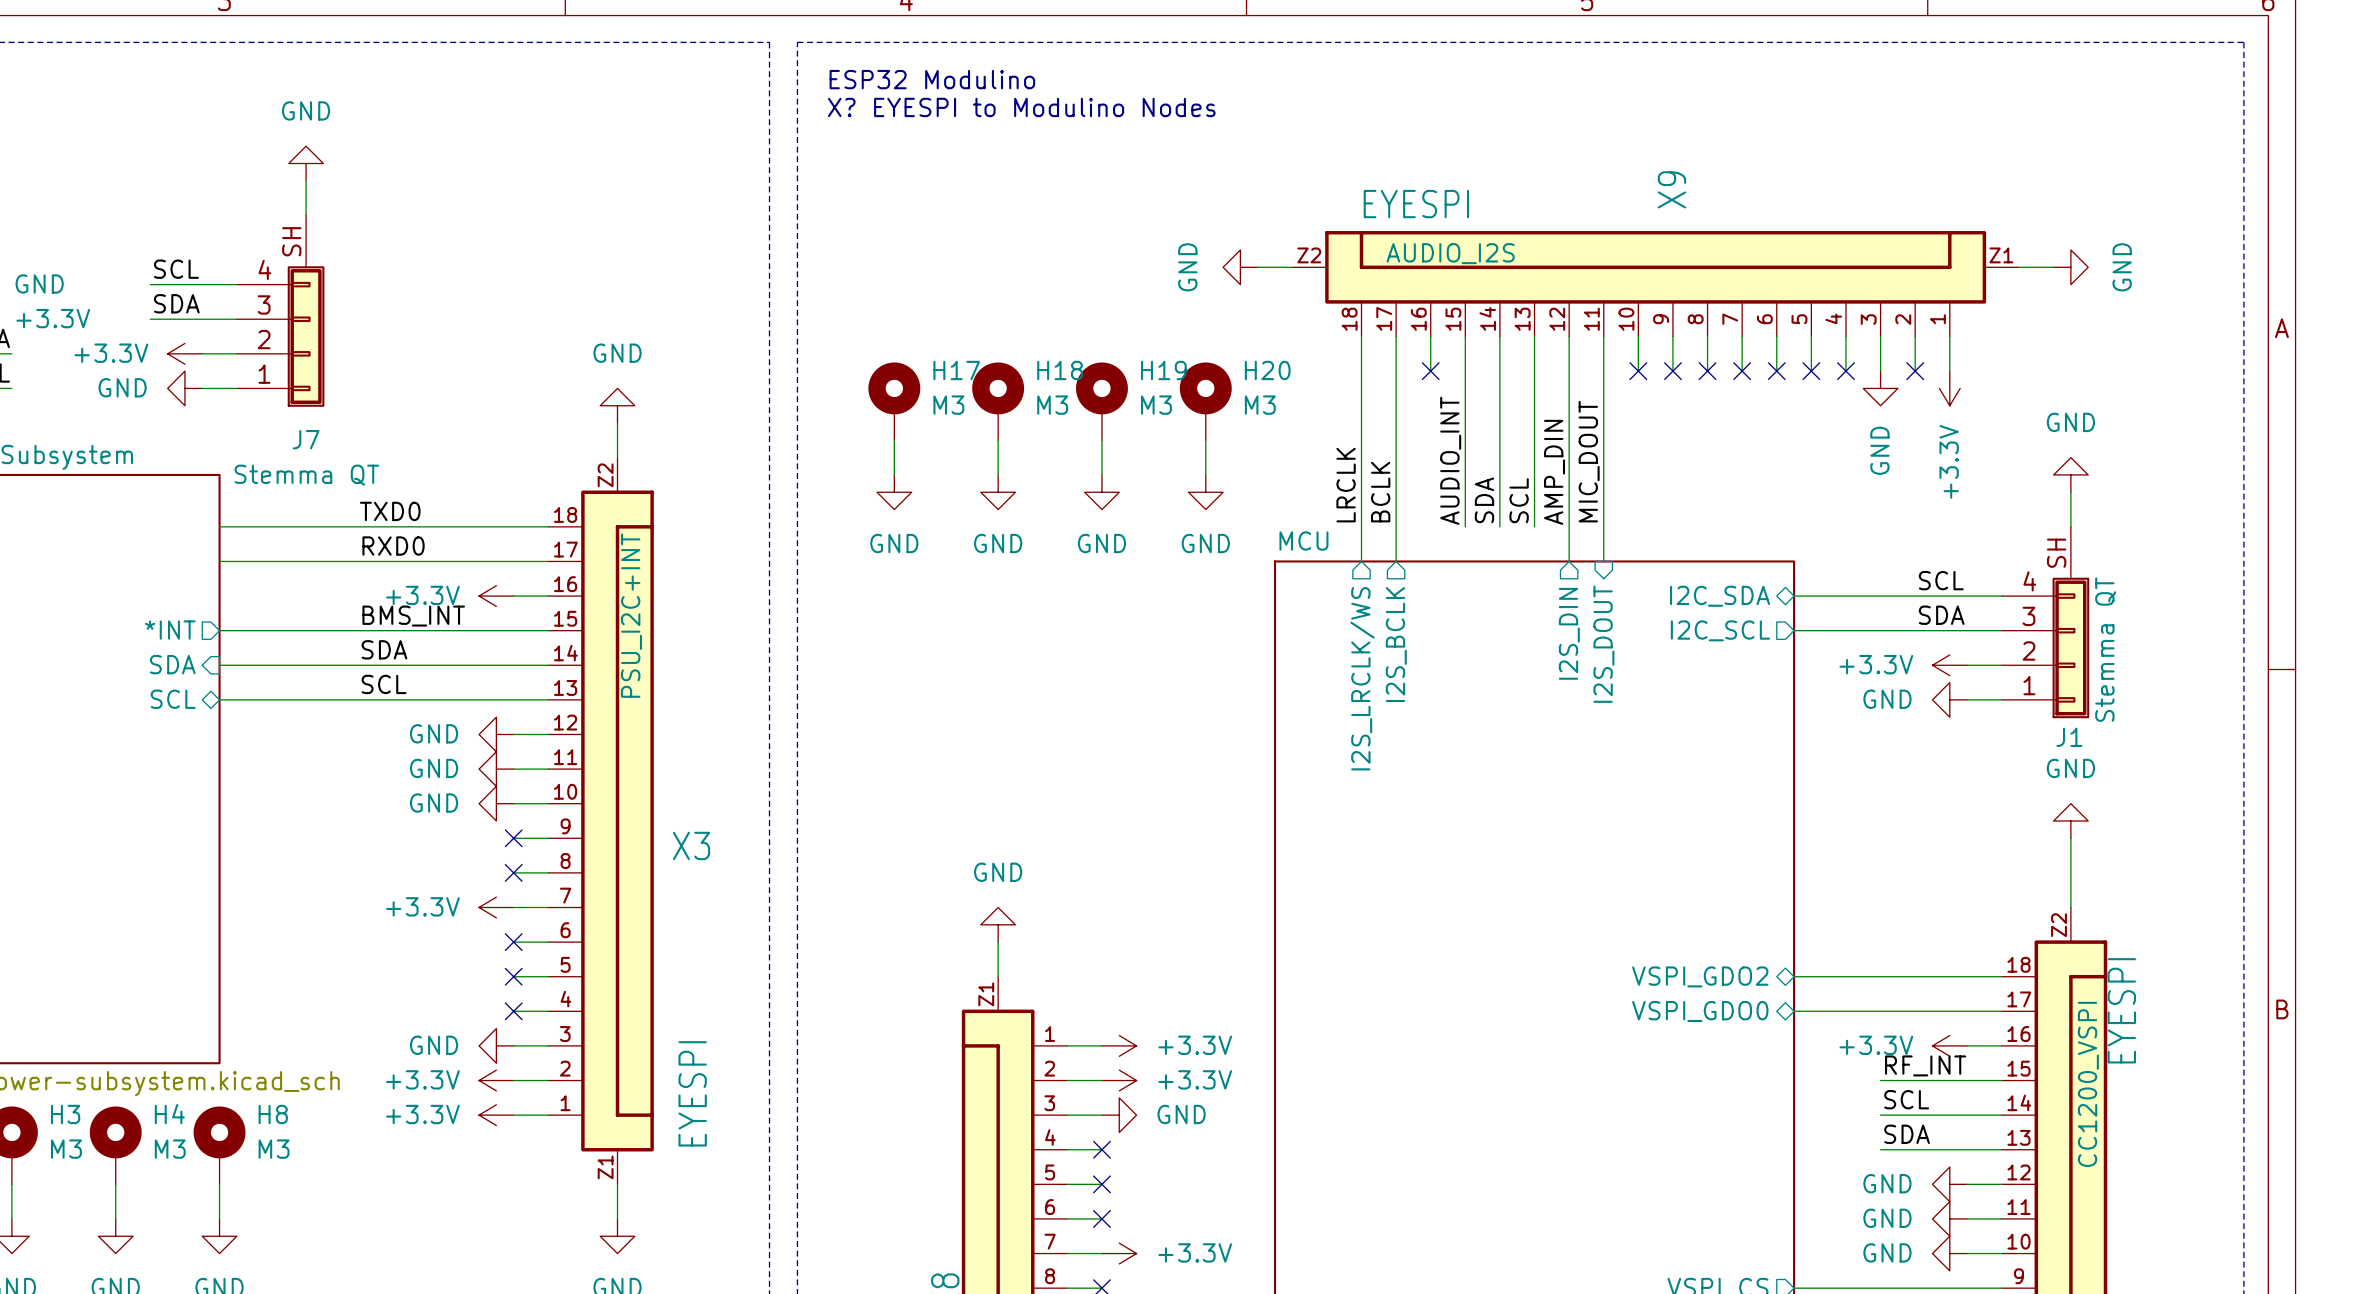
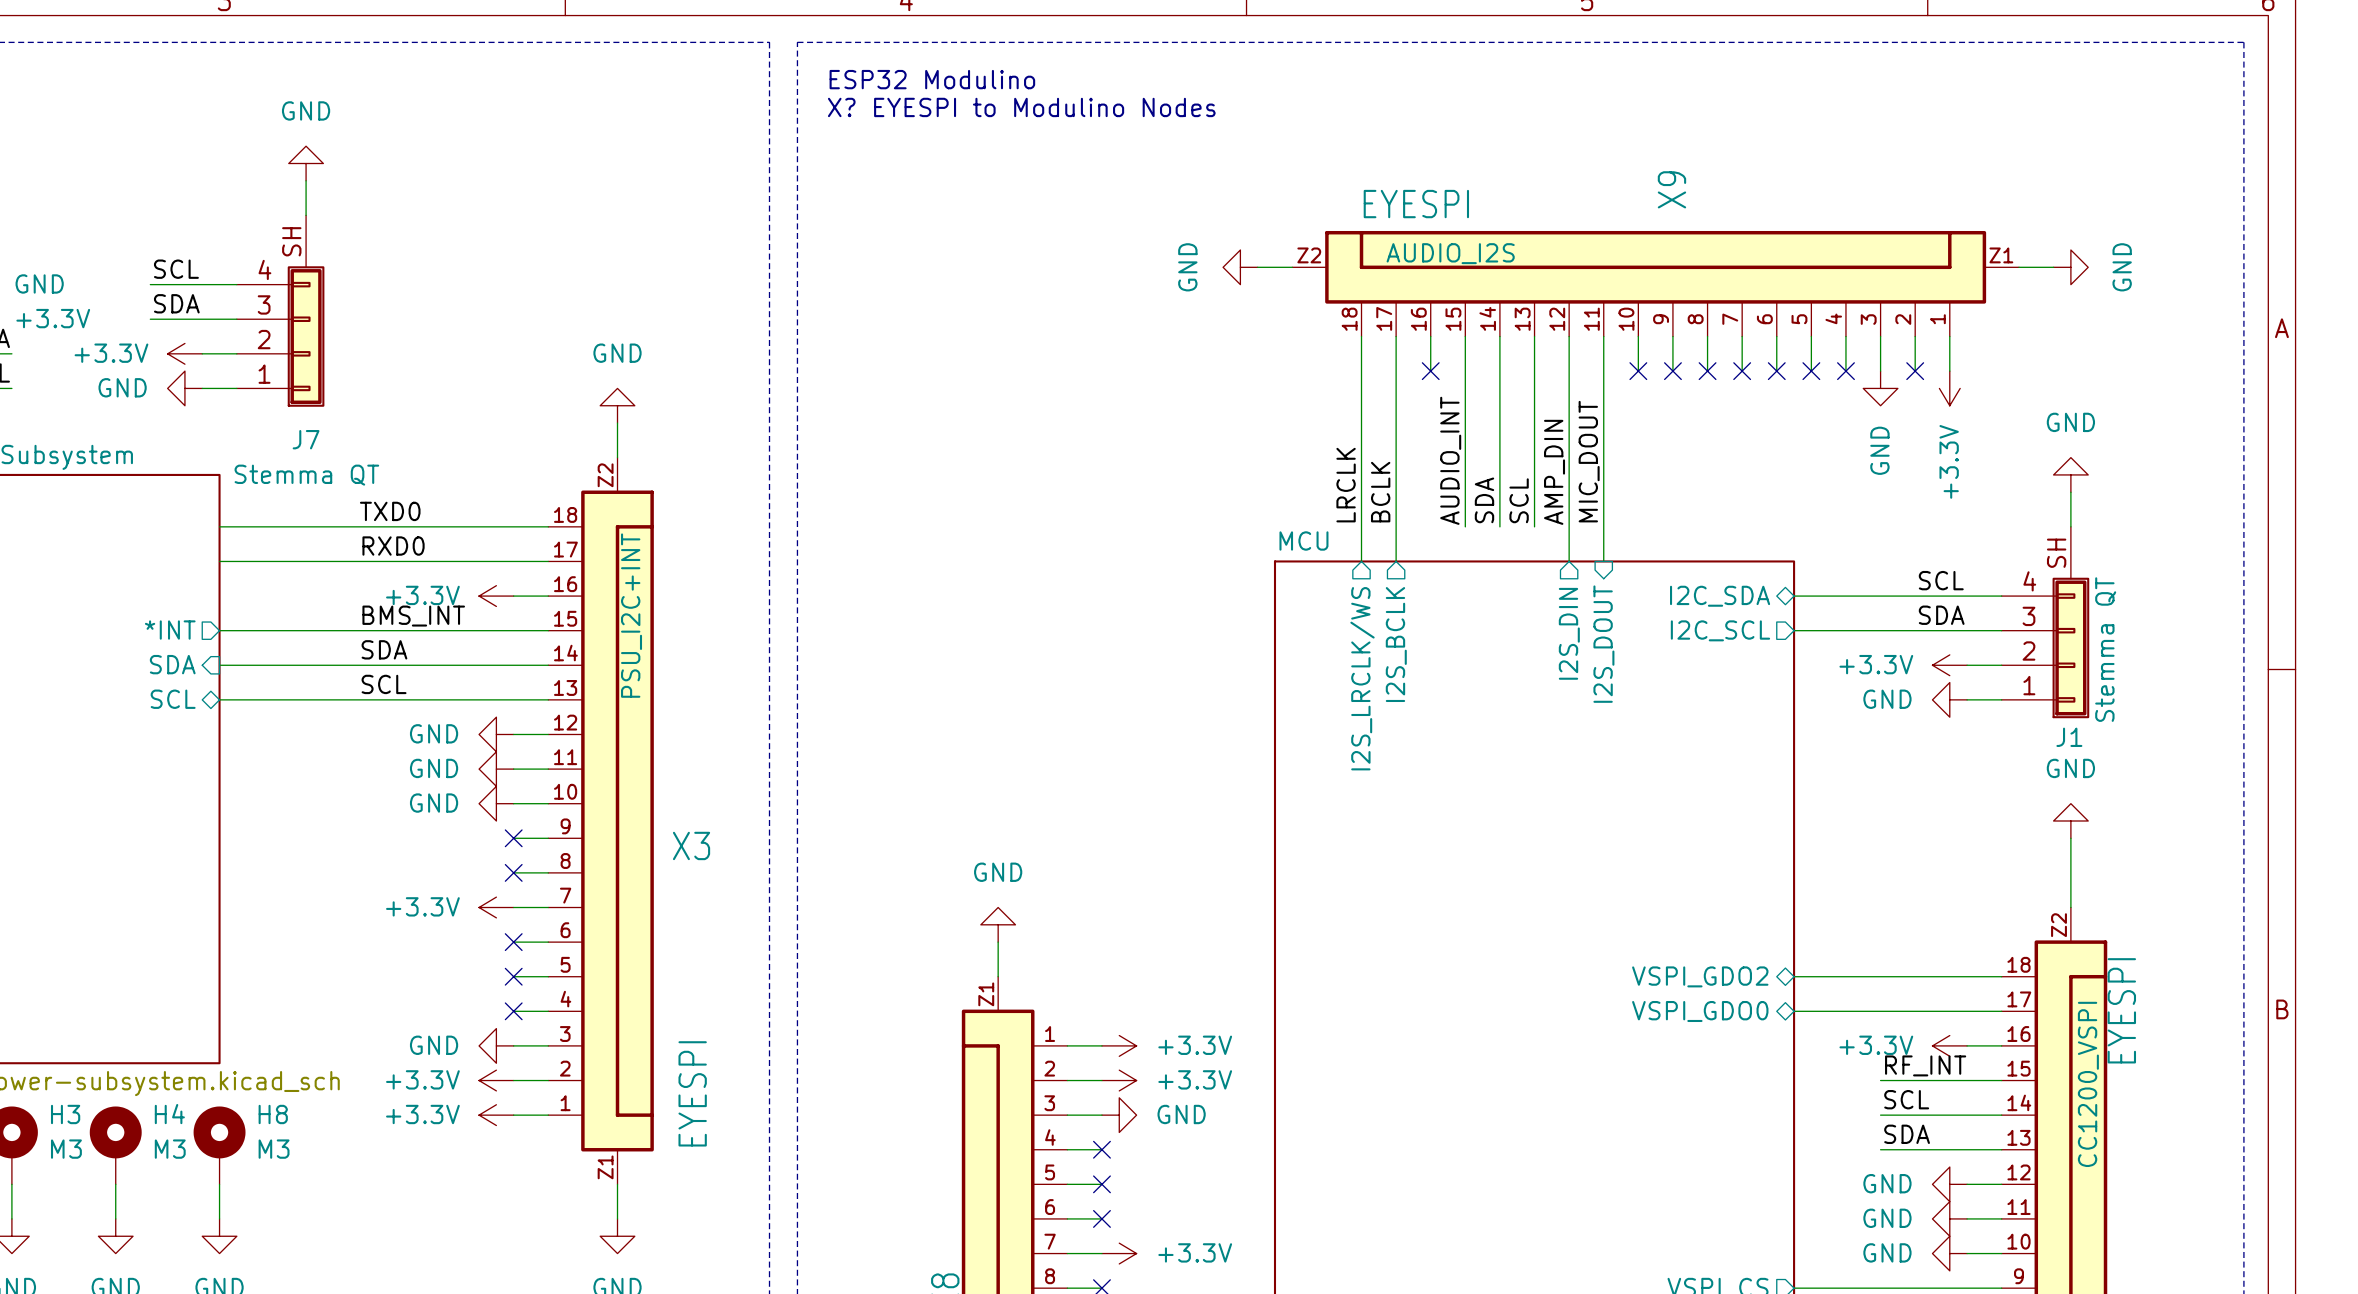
H17: M3 (894, 401) -> none
H18: M3 (998, 401) -> none
H19: M3 (1101, 401) -> none
H20: M3 (1205, 401) -> none
wire: (894, 440) (894, 474) -> none
wire: (998, 440) (998, 474) -> none
wire: (1101, 440) (1101, 474) -> none
wire: (1205, 440) (1205, 474) -> none
power symbol: GND (894, 492) -> none
power symbol: GND (998, 492) -> none
power symbol: GND (1101, 492) -> none
power symbol: GND (1205, 492) -> none

